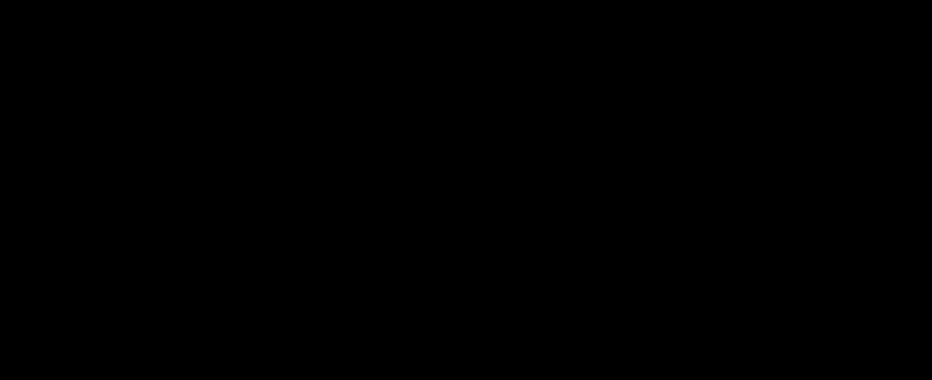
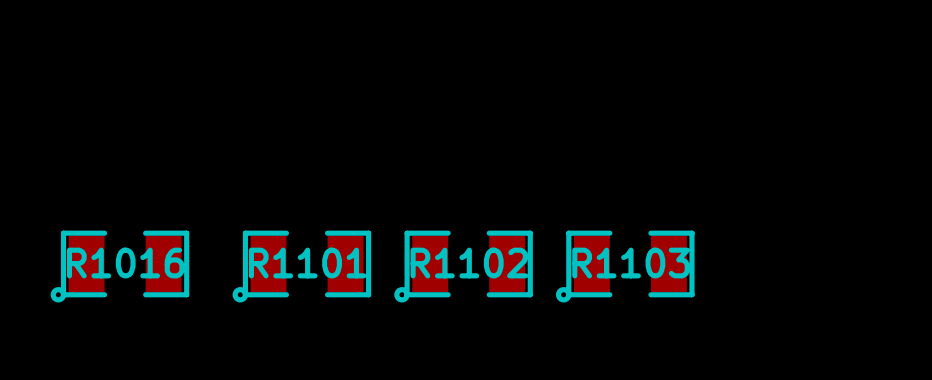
R1016: none -> (119, 266)
R1101: none -> (301, 266)
R1102: none -> (463, 266)
R1103: none -> (625, 266)

